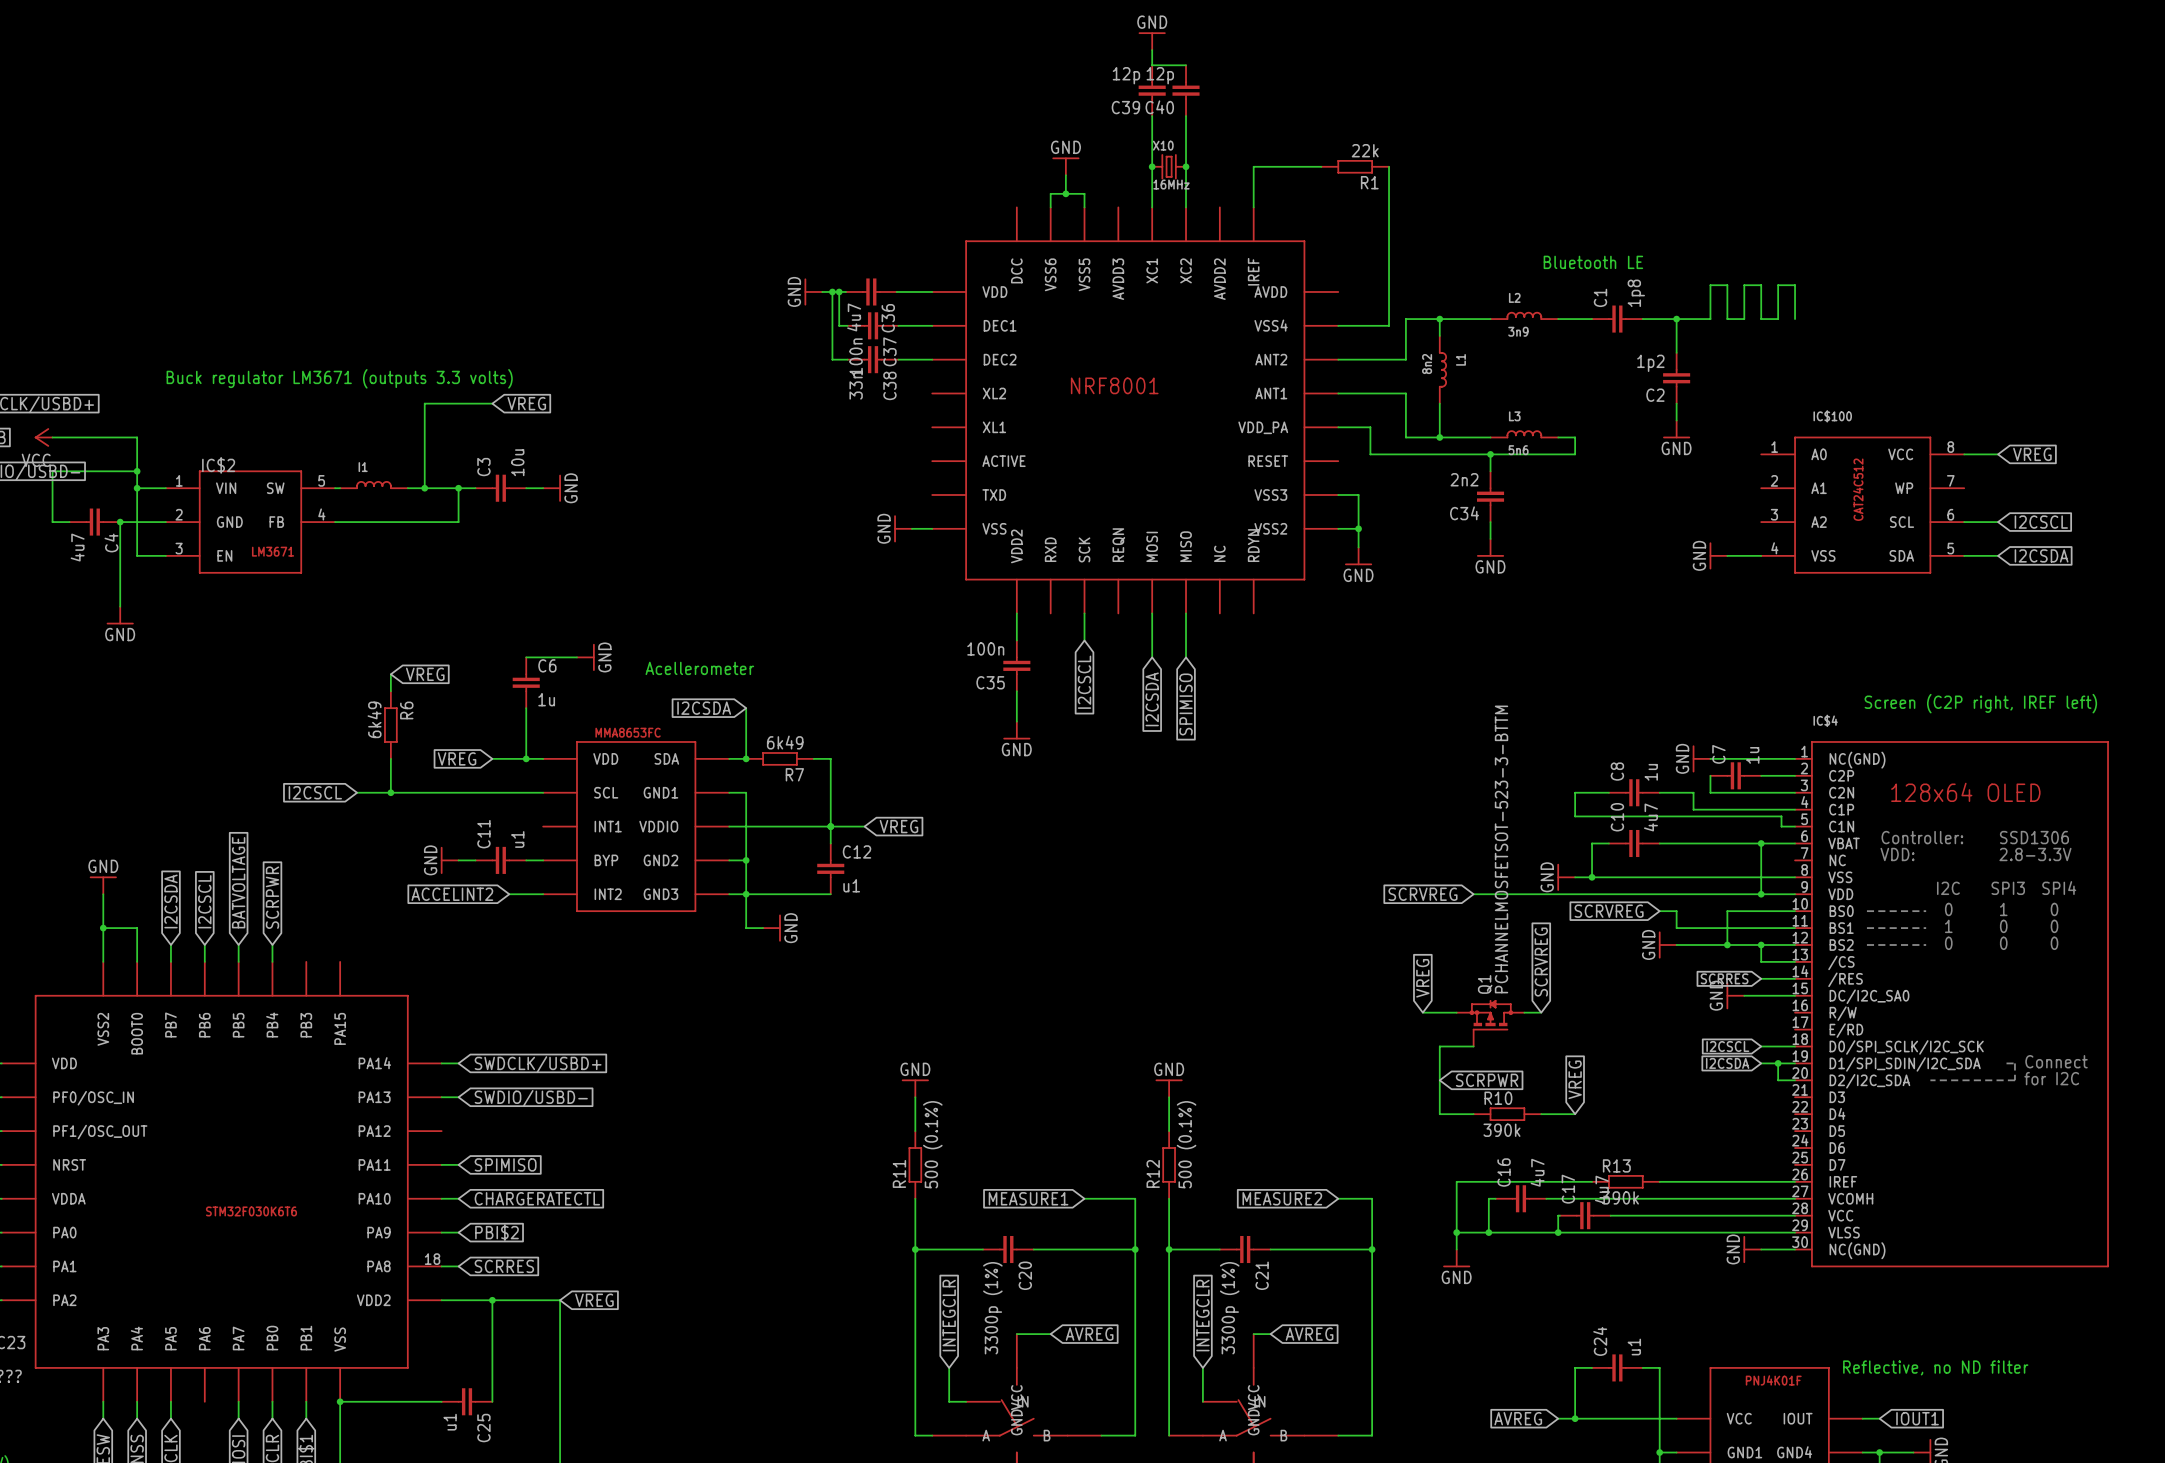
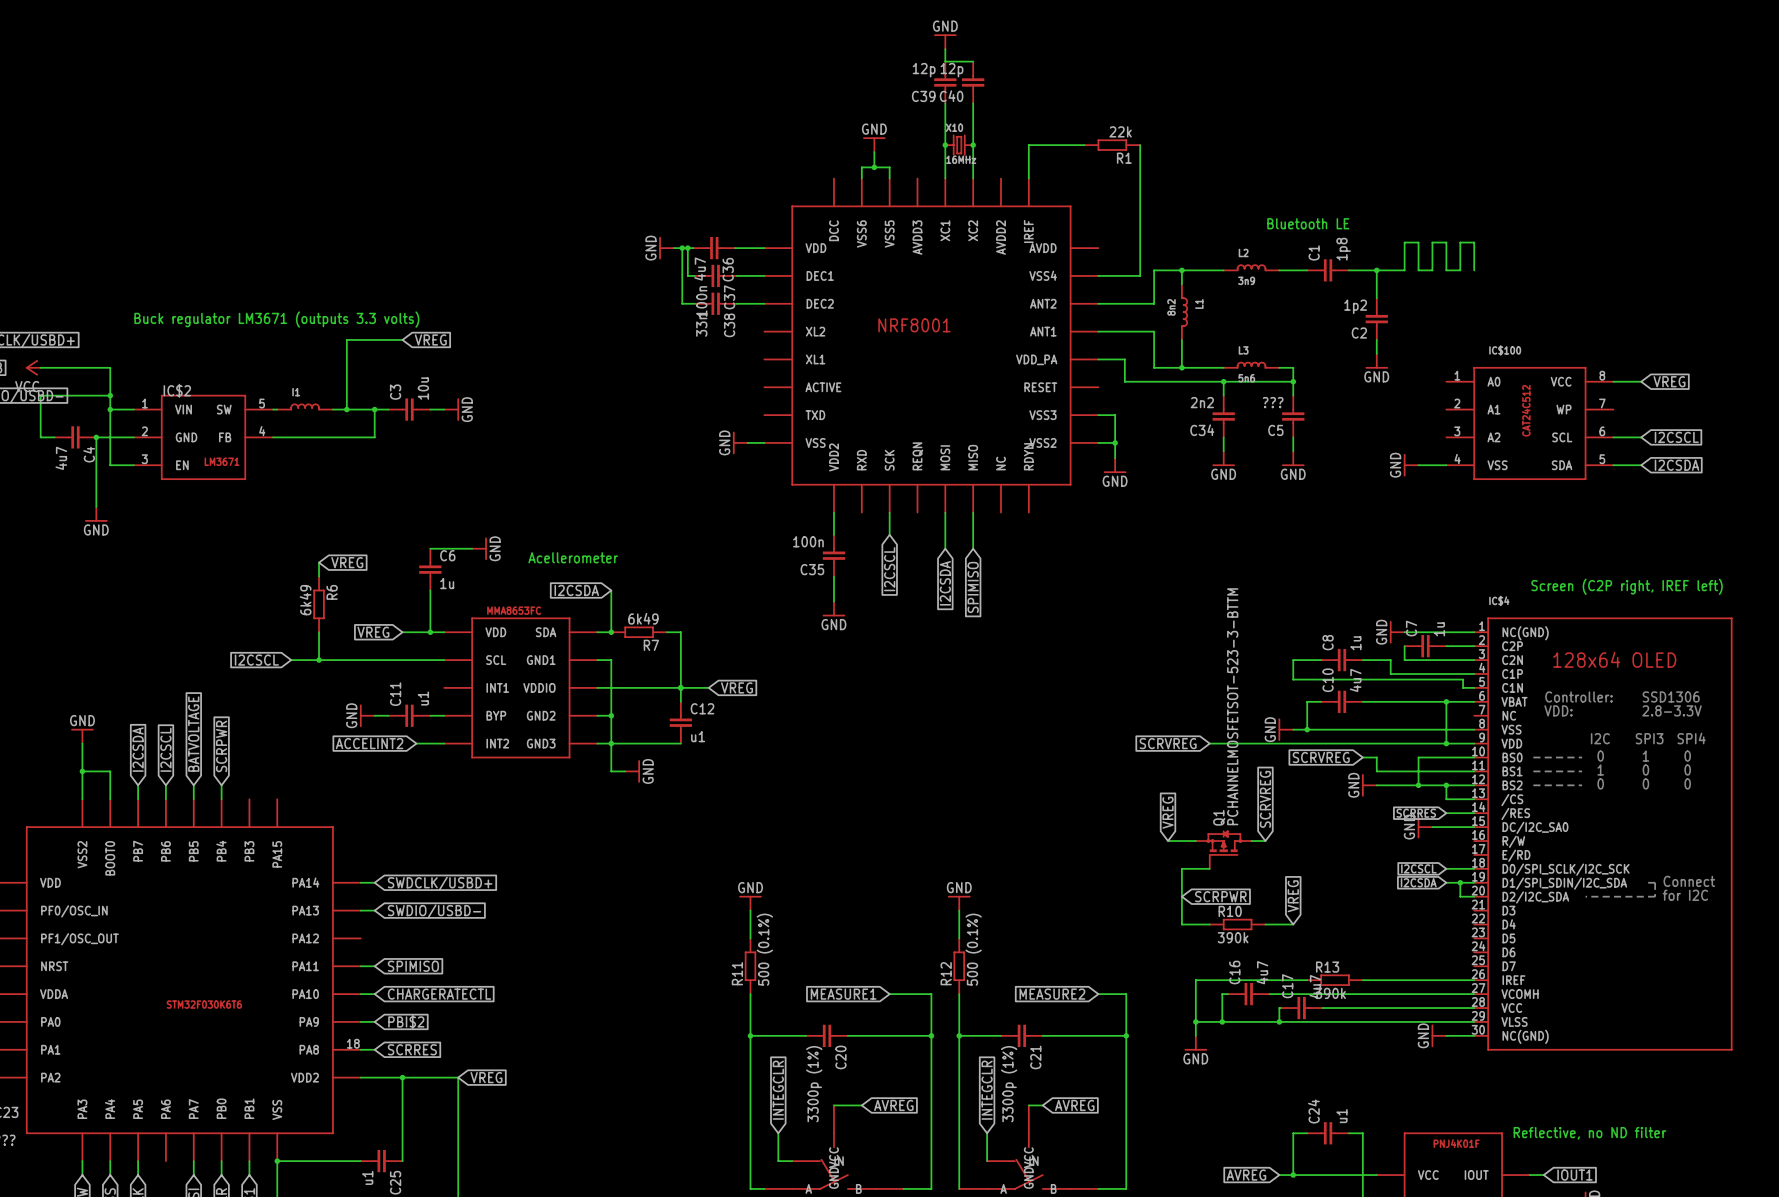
wire: none -> (1293, 381) (1293, 395)
junction: none -> (1293, 381)
C5: none -> ??? (1293, 416)
wire: none -> (1293, 437) (1293, 451)
power symbol: none -> GND (1293, 458)

